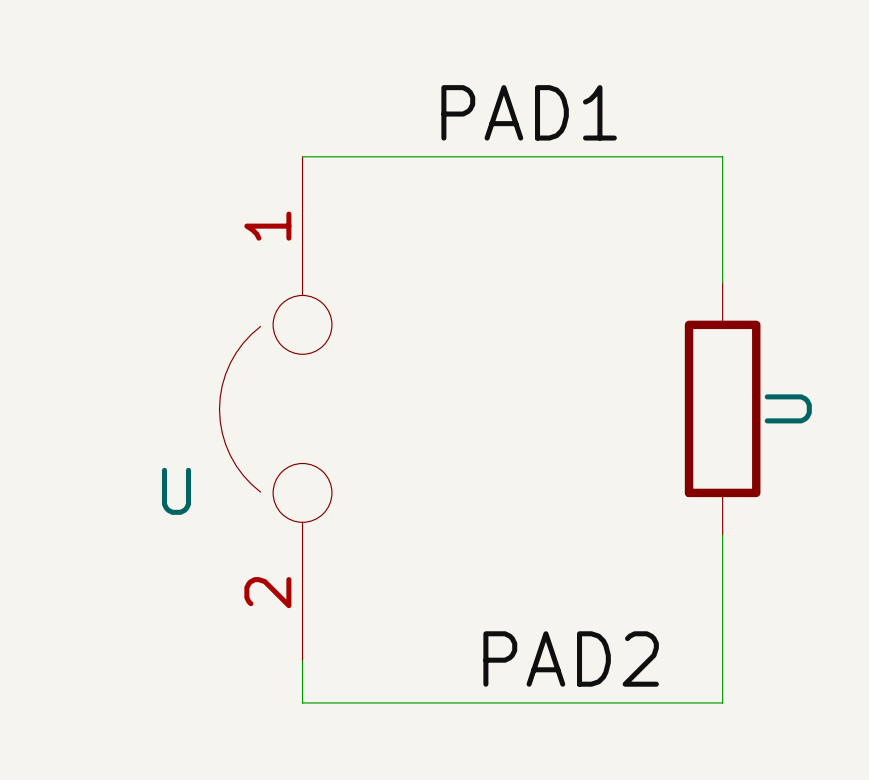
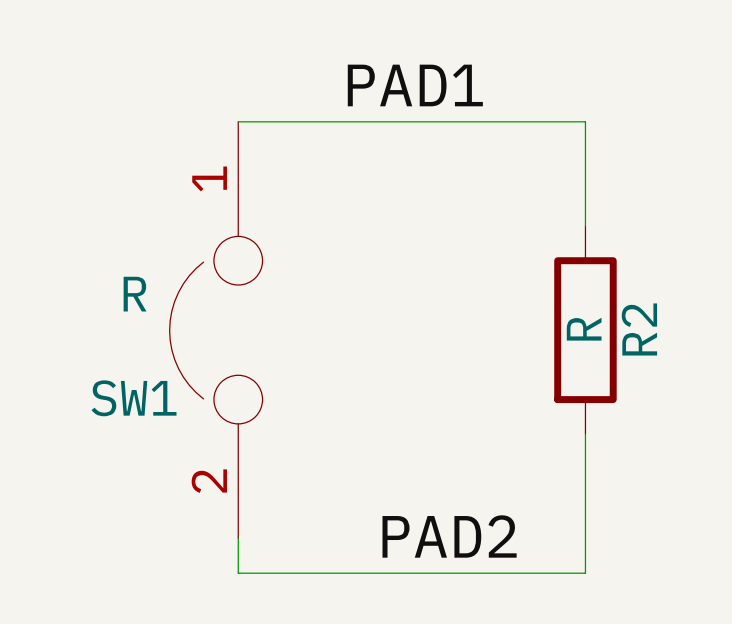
U value: none -> R (135, 294)
U value: none -> R (584, 329)
U name: U (788, 408) -> R2 (639, 329)
U name: U (176, 491) -> SW1 (134, 398)

